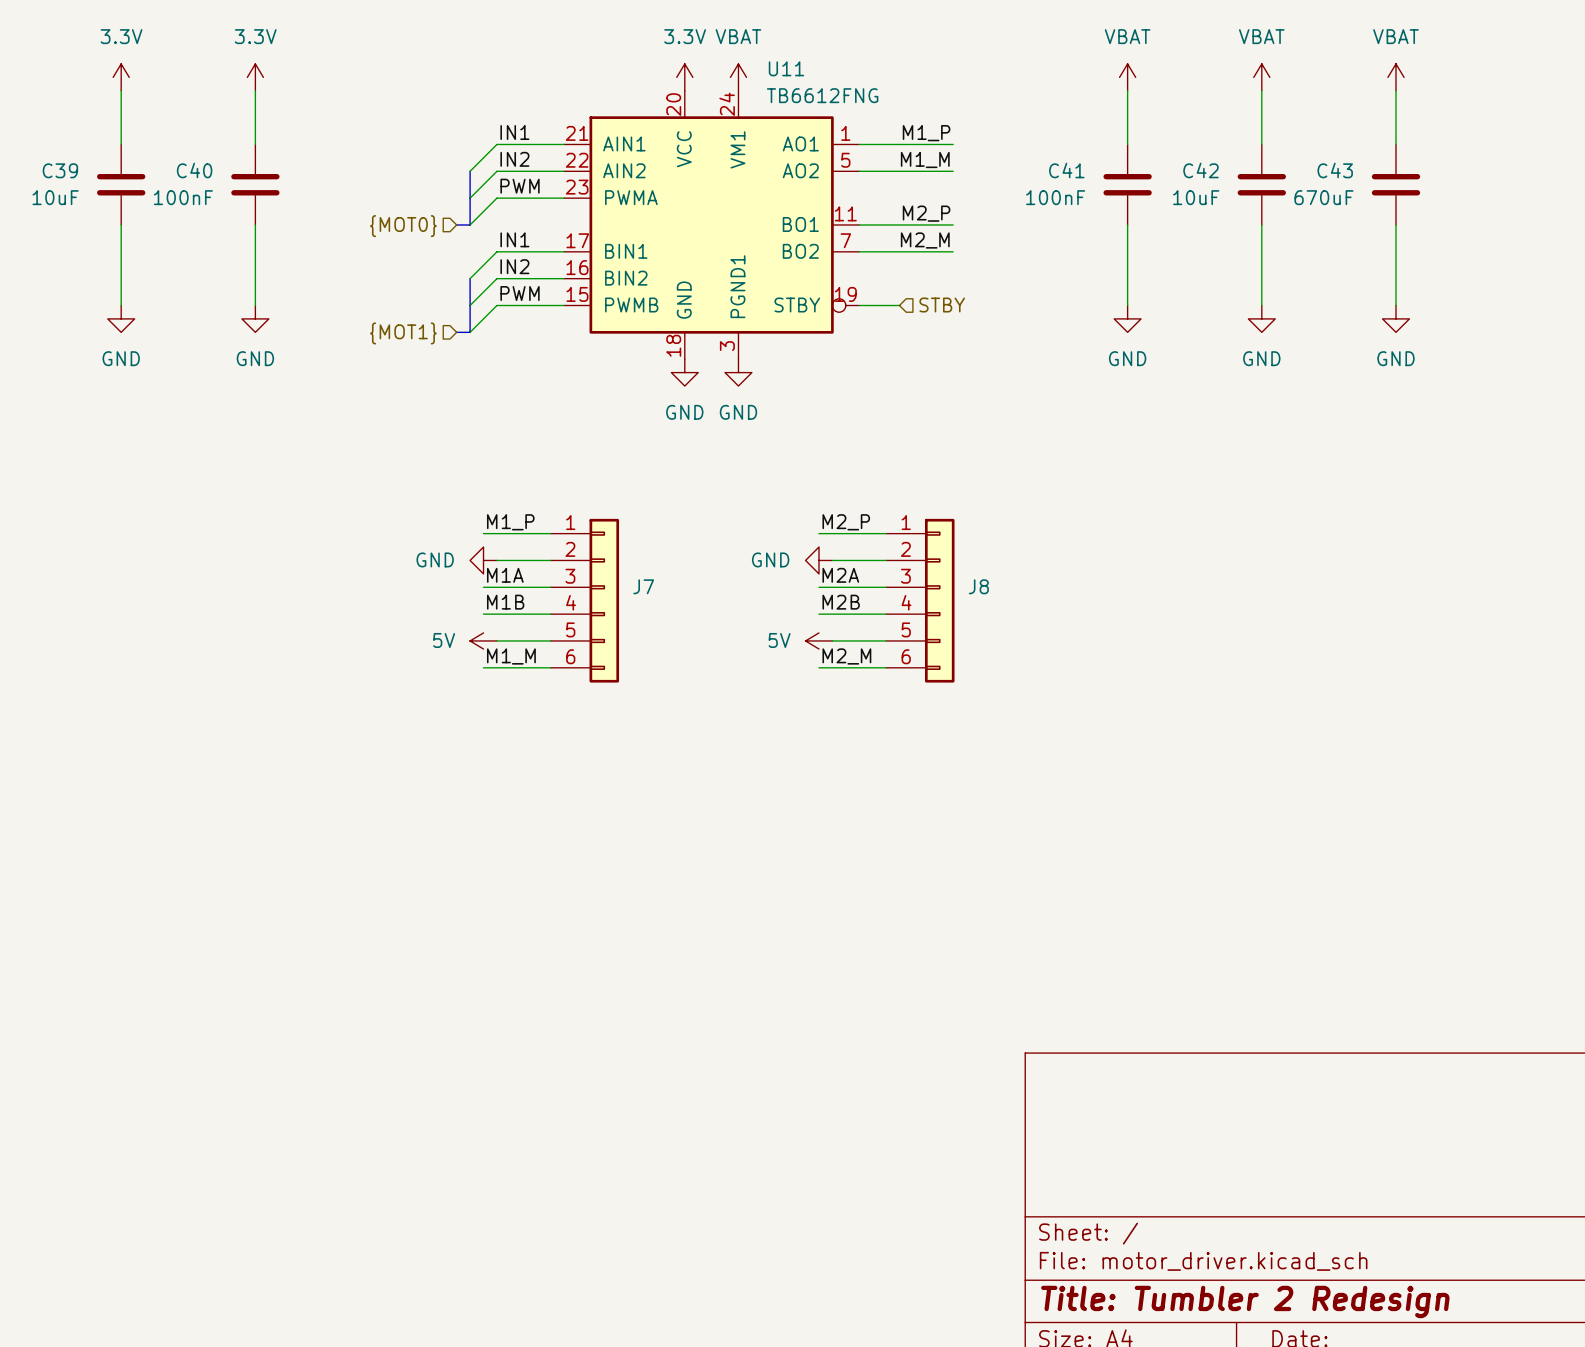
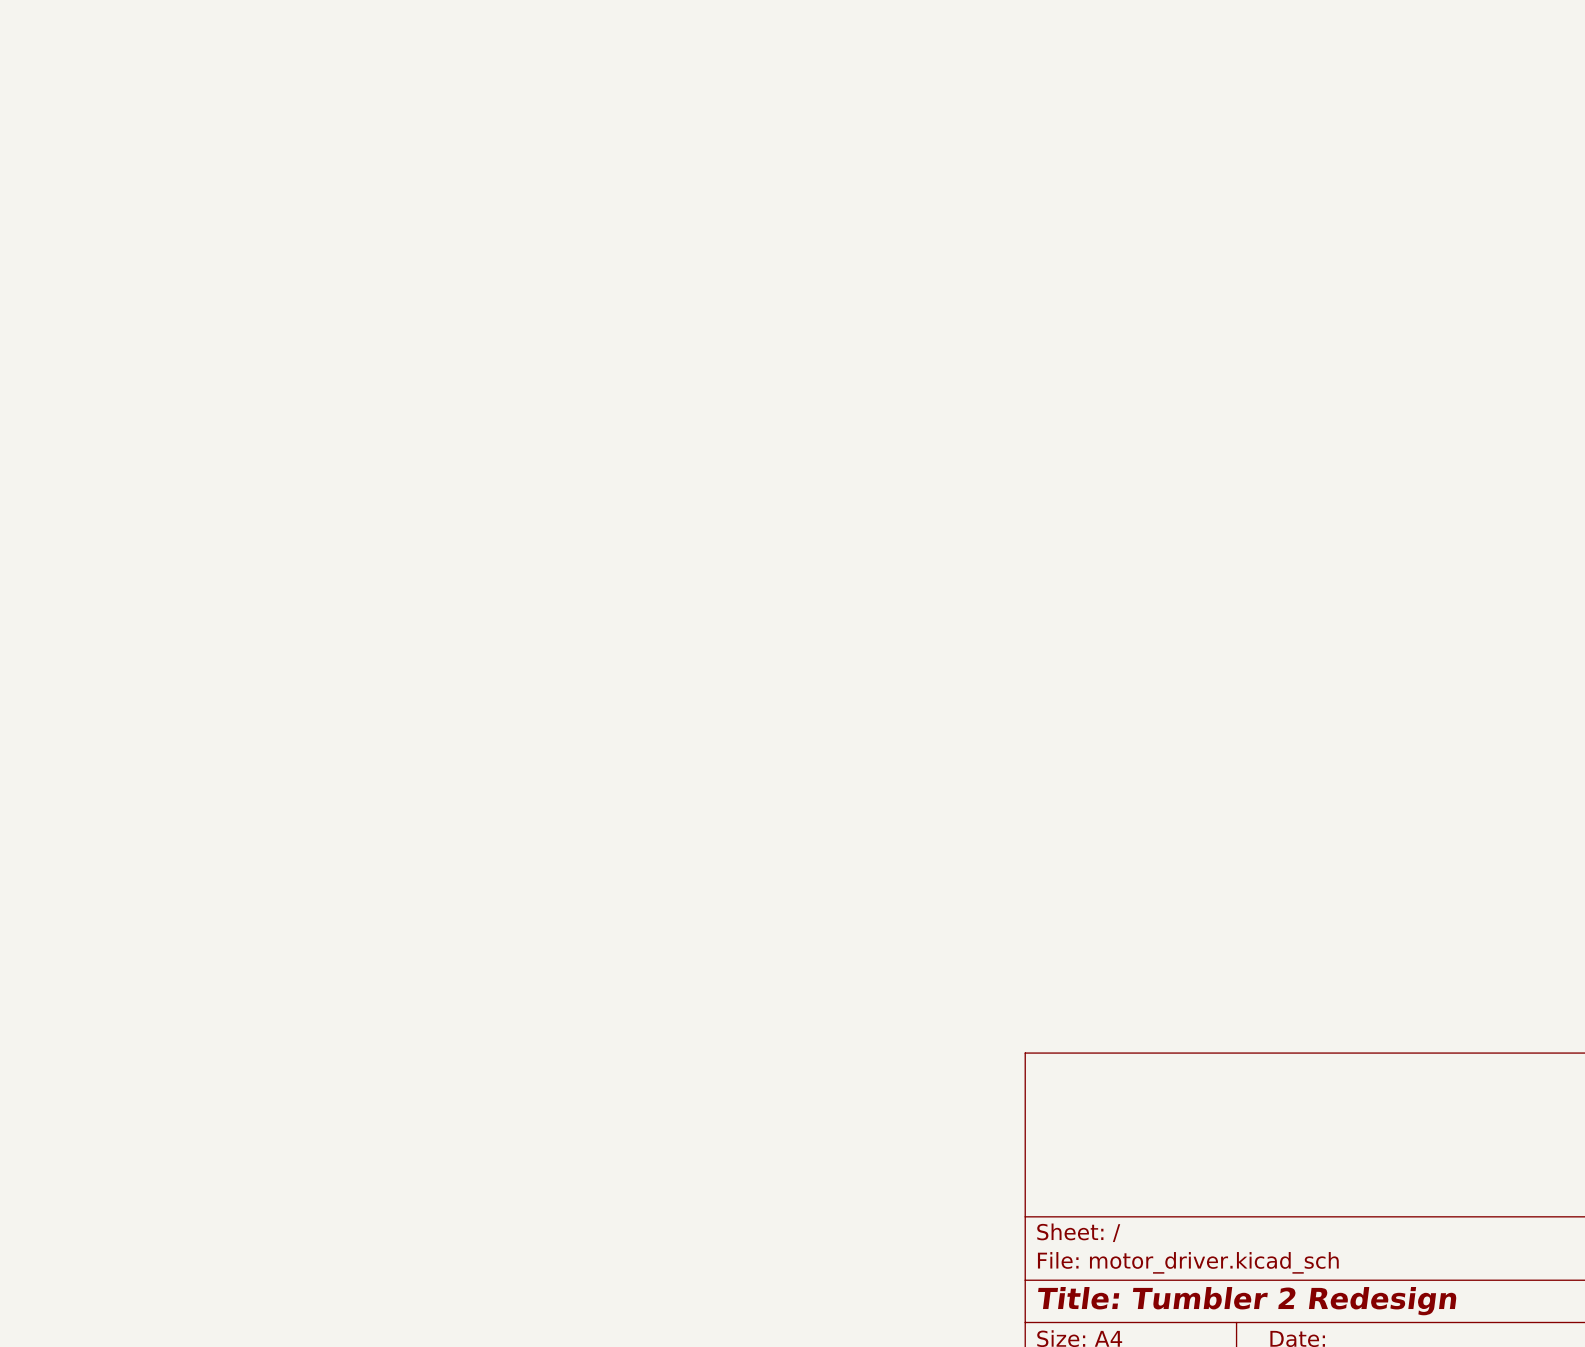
power symbol: 3.3V (121, 77) -> none
power symbol: 3.3V (255, 77) -> none
power symbol: 3.3V (684, 77) -> none
power symbol: VBAT (738, 77) -> none
power symbol: VBAT (1127, 77) -> none
power symbol: VBAT (1261, 77) -> none
power symbol: VBAT (1396, 77) -> none
wire: (121, 90) (121, 144) -> none
wire: (255, 90) (255, 144) -> none
wire: (1127, 90) (1127, 144) -> none
wire: (1261, 90) (1261, 144) -> none
wire: (1396, 90) (1396, 144) -> none
label: IN1 (514, 132) -> none
label: M1_P (926, 133) -> none
wire: (564, 144) (496, 144) (470, 171) -> none
wire: (859, 144) (953, 144) -> none
label: IN2 (514, 159) -> none
label: M1_M (925, 159) -> none
bus: (470, 171) (470, 224) (456, 224) -> none
wire: (564, 171) (496, 171) (470, 198) -> none
wire: (859, 171) (953, 171) -> none
C39: 10uF (121, 184) -> none
C40: 100nF (255, 184) -> none
C41: 100nF (1127, 184) -> none
C42: 10uF (1261, 184) -> none
C43: 670uF (1396, 184) -> none
label: PWM (520, 186) -> none
wire: (564, 198) (496, 198) (470, 224) -> none
label: M2_P (926, 213) -> none
wire: (121, 224) (121, 305) -> none
wire: (255, 224) (255, 305) -> none
U11: TB6612FNG (711, 224) -> none
wire: (859, 224) (953, 224) -> none
wire: (1127, 224) (1127, 305) -> none
wire: (1261, 224) (1261, 305) -> none
wire: (1396, 224) (1396, 305) -> none
hierarchical label: {MOT0} (403, 226) -> none
label: IN1 (514, 239) -> none
label: M2_M (925, 240) -> none
wire: (564, 251) (496, 251) (470, 278) -> none
wire: (859, 251) (953, 251) -> none
label: IN2 (514, 266) -> none
bus: (470, 278) (470, 332) (456, 332) -> none
wire: (564, 278) (496, 278) (470, 305) -> none
label: PWM (520, 293) -> none
wire: (564, 305) (496, 305) (470, 332) -> none
wire: (859, 305) (899, 305) -> none
hierarchical label: STBY (942, 305) -> none
power symbol: GND (121, 318) -> none
power symbol: GND (255, 318) -> none
power symbol: GND (1127, 318) -> none
power symbol: GND (1261, 318) -> none
power symbol: GND (1396, 318) -> none
hierarchical label: {MOT1} (403, 333) -> none
power symbol: GND (684, 372) -> none
power symbol: GND (738, 372) -> none
label: M1_P (510, 522) -> none
label: M2_P (846, 522) -> none
wire: (483, 533) (550, 533) -> none
wire: (818, 533) (886, 533) -> none
power symbol: GND (483, 560) -> none
wire: (496, 560) (550, 560) -> none
power symbol: GND (818, 560) -> none
wire: (832, 560) (886, 560) -> none
label: M1A (505, 575) -> none
label: M2A (840, 575) -> none
wire: (483, 587) (550, 587) -> none
wire: (818, 587) (886, 587) -> none
J7: (584, 600) -> none
J8: (920, 600) -> none
label: M1B (505, 602) -> none
label: M2B (841, 602) -> none
wire: (483, 614) (550, 614) -> none
wire: (818, 614) (886, 614) -> none
power symbol: 5V (483, 640) -> none
wire: (496, 640) (550, 640) -> none
power symbol: 5V (818, 640) -> none
wire: (832, 640) (886, 640) -> none
label: M1_M (511, 656) -> none
label: M2_M (846, 656) -> none
wire: (483, 667) (550, 667) -> none
wire: (818, 667) (886, 667) -> none

